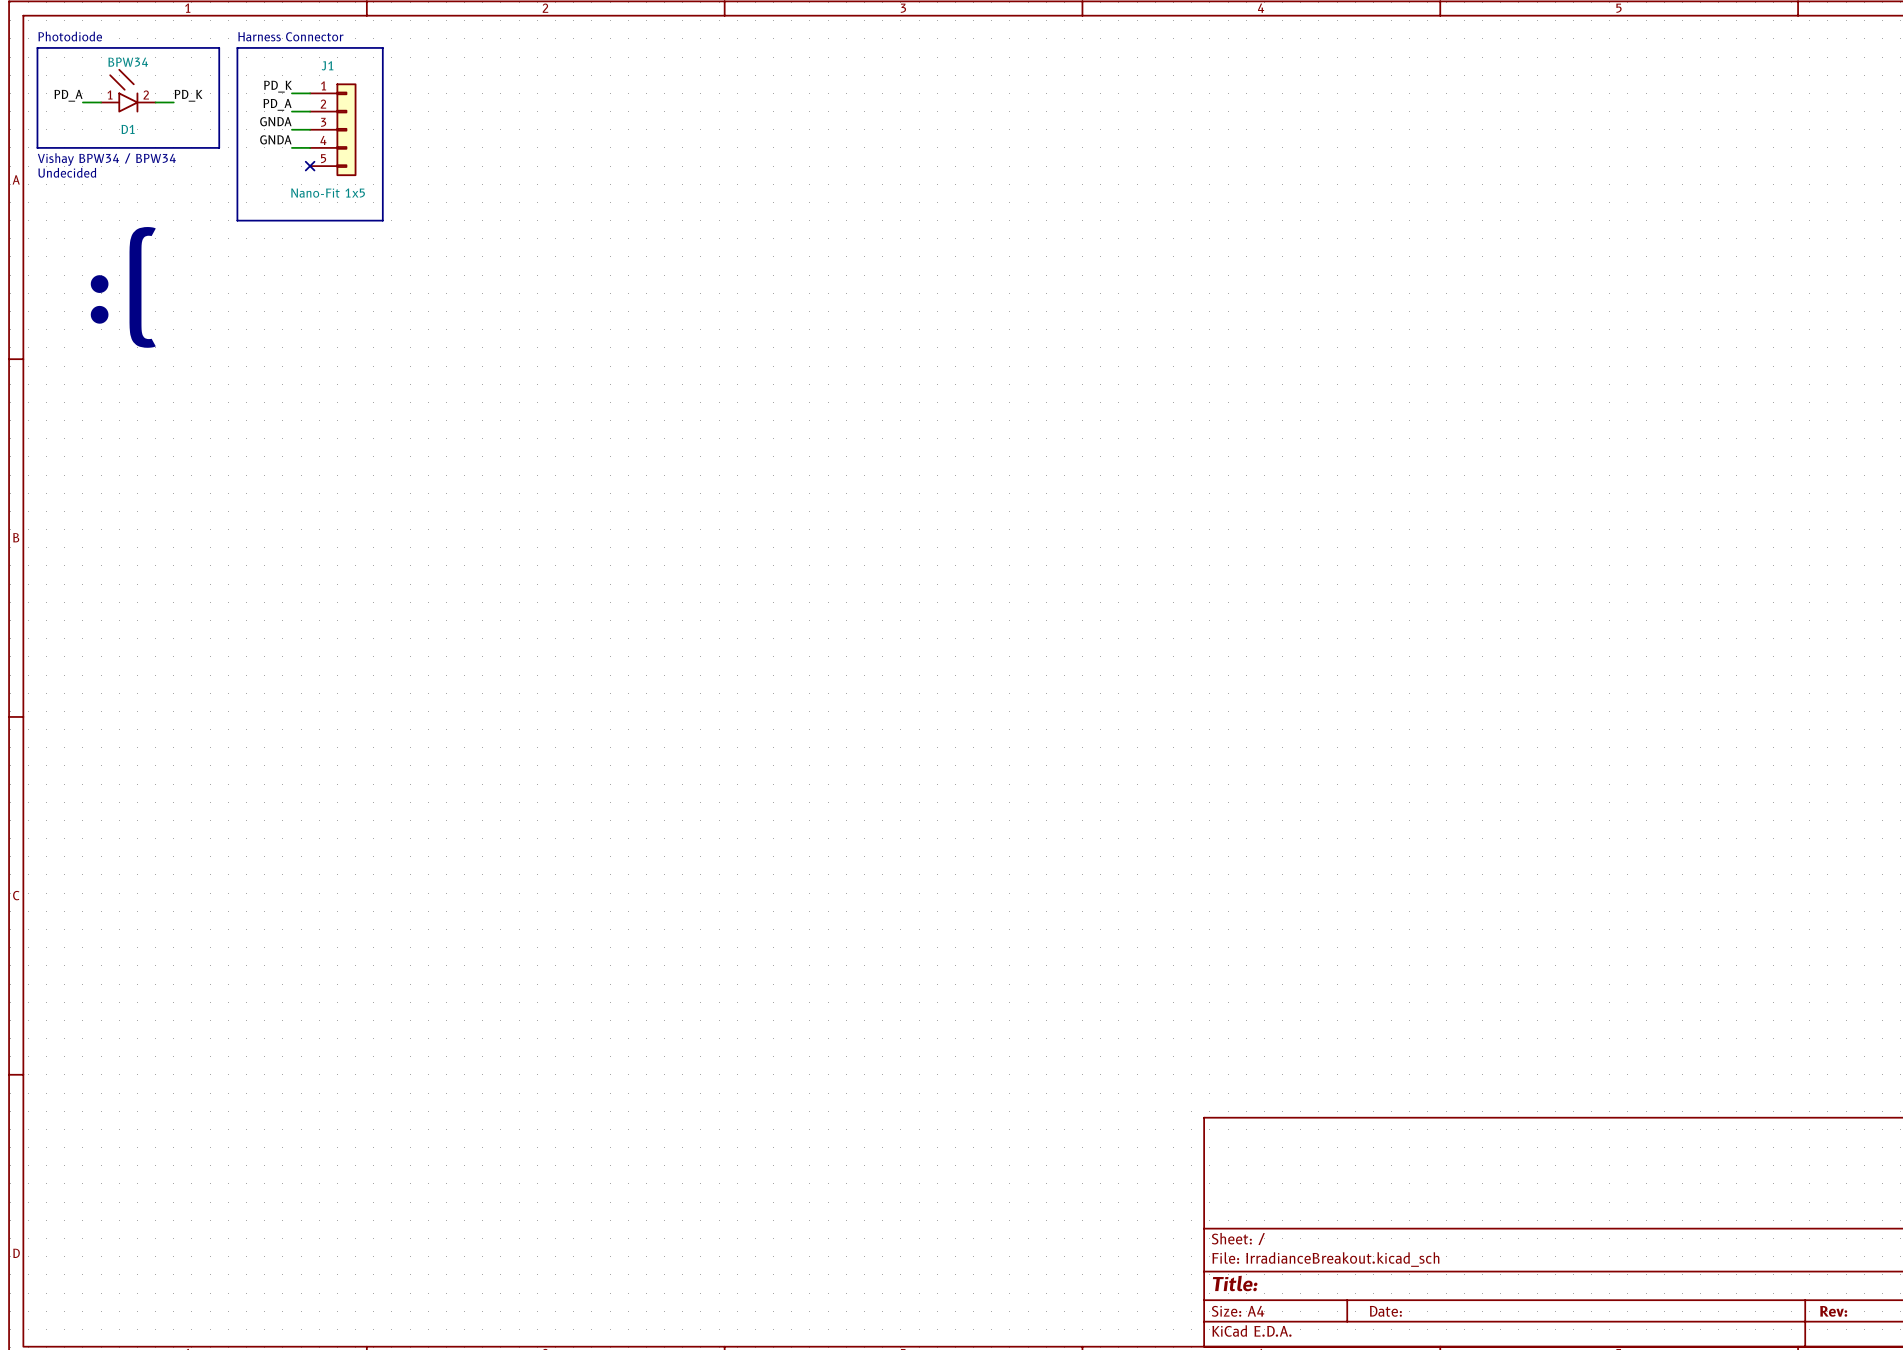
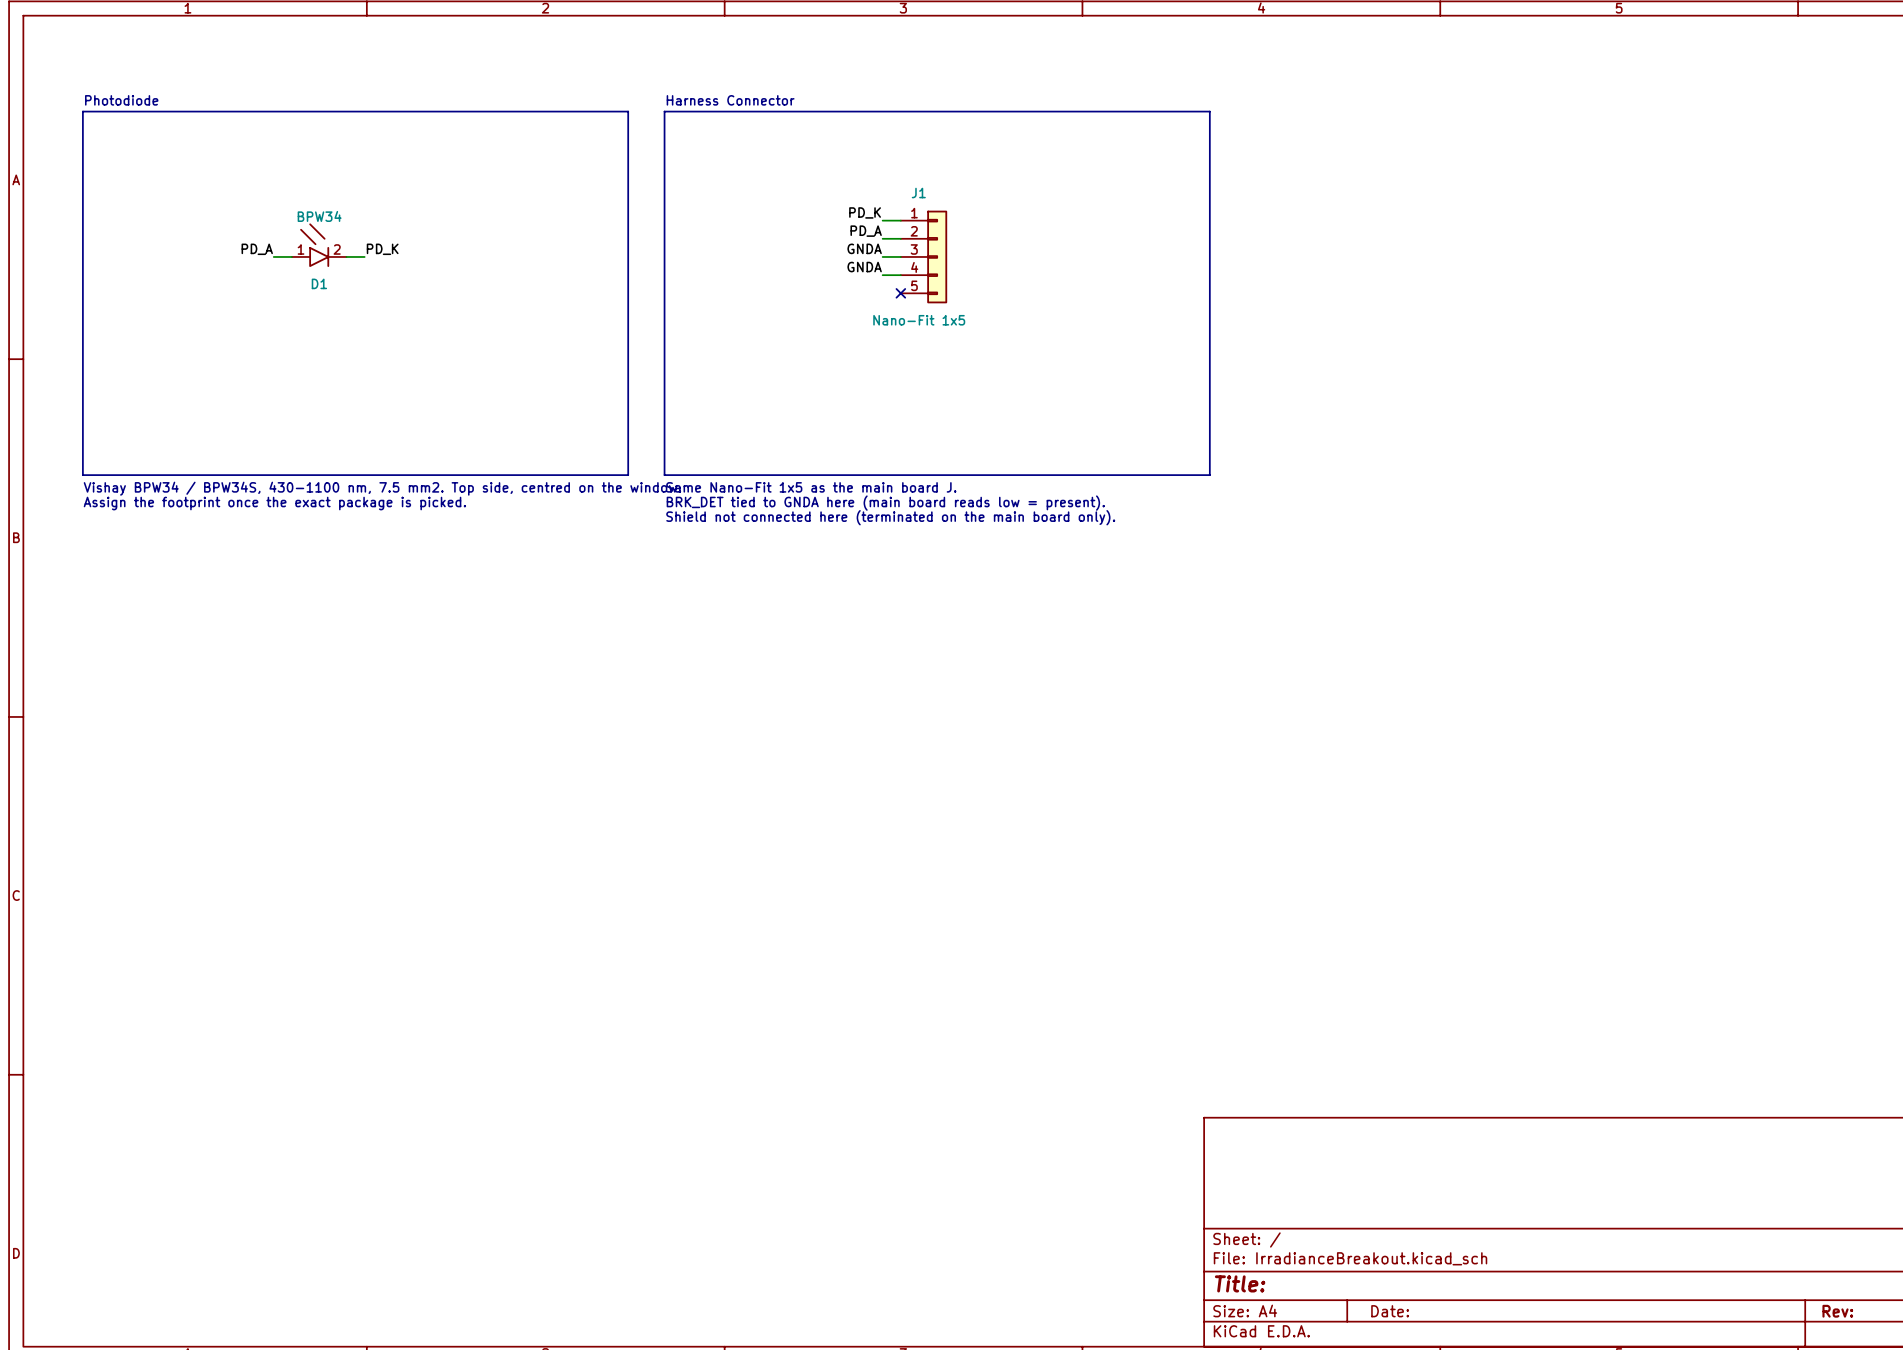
text position: Photodiode (70, 36) -> Photodiode (121, 100)
text: Harness Connector (290, 36) -> none
line: (37, 47) (219, 47) (219, 147) (37, 147) (37, 47) -> none
line: (237, 47) (382, 47) (382, 220) (237, 220) (237, 47) -> none
label: PD_K (278, 86) -> none
D1 position: (128, 91) -> (319, 245)
wire: (291, 93) (310, 93) -> none
label: PD_A (68, 95) -> none
label: PD_K (188, 95) -> none
text: none -> Harness Connector (730, 100)
wire: (82, 102) (101, 102) -> none
wire: (155, 102) (173, 102) -> none
label: PD_A (277, 104) -> none
line: none -> (82, 111) (628, 111) (628, 475) (82, 475) (82, 111)
line: none -> (664, 111) (1209, 111) (1209, 475) (664, 475) (664, 111)
label: GNDA (275, 121) -> none
wire: (291, 129) (310, 129) -> (346, 256) (364, 256)
J1 position: (333, 129) -> (924, 256)
label: GNDA (275, 139) -> none
wire: (291, 147) (310, 147) -> (273, 256) (291, 256)
text: Vishay BPW34 / BPW34 (106, 159) -> none
no-connect mark: (310, 166) -> none
text: Undecided (67, 172) -> none
label: none -> PD_K (865, 212)
wire: none -> (882, 220) (900, 220)
label: none -> PD_A (866, 231)
wire: none -> (882, 238) (900, 238)
label: none -> GNDA (864, 248)
label: none -> PD_A (257, 249)
label: none -> PD_K (382, 249)
wire: none -> (882, 256) (900, 256)
label: none -> GNDA (864, 267)
wire: none -> (882, 275) (900, 275)
text: :( (123, 287) -> none
no-connect mark: none -> (900, 293)
text: none -> Same Nano-Fit 1x5 as the main board J. (811, 487)
text: none -> Vishay BPW34 / BPW34S, 430-1100 nm, 7.5 mm2. Top side, centred on the window. (382, 488)
text: none -> Assign the footprint once the exact package is picked. (274, 503)
text: none -> BRK_DET tied to GNDA here (main board reads low = present). (885, 503)
text: none -> Shield not connected here (terminated on the main board only). (890, 517)

